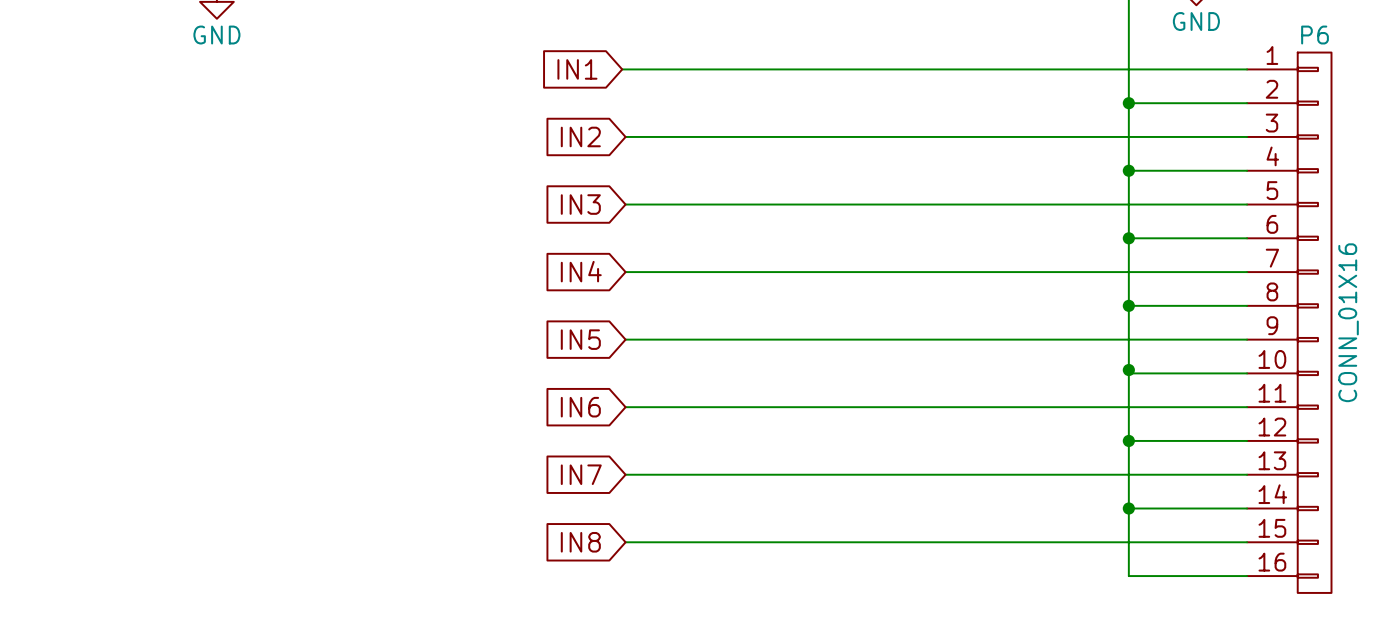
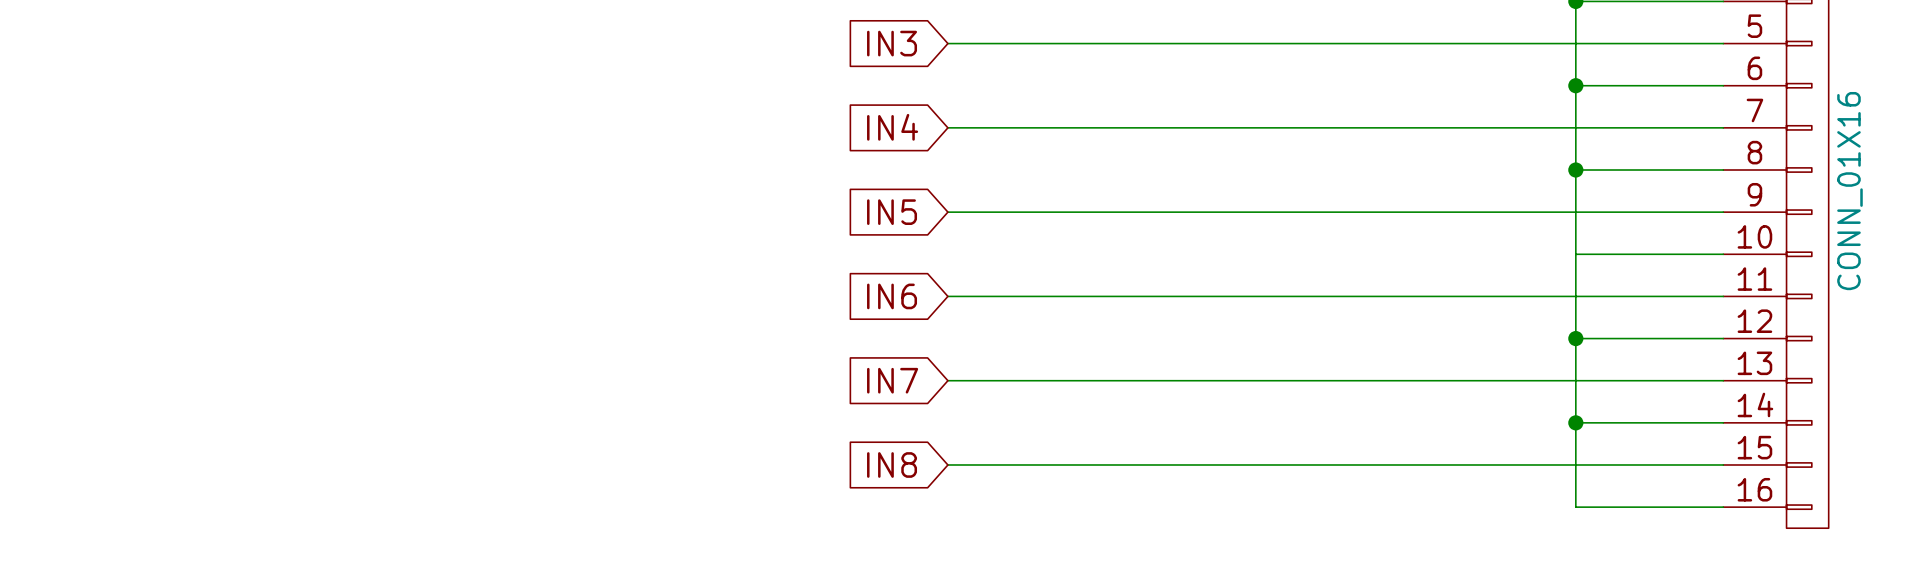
junction: (1128, 370) -> none

